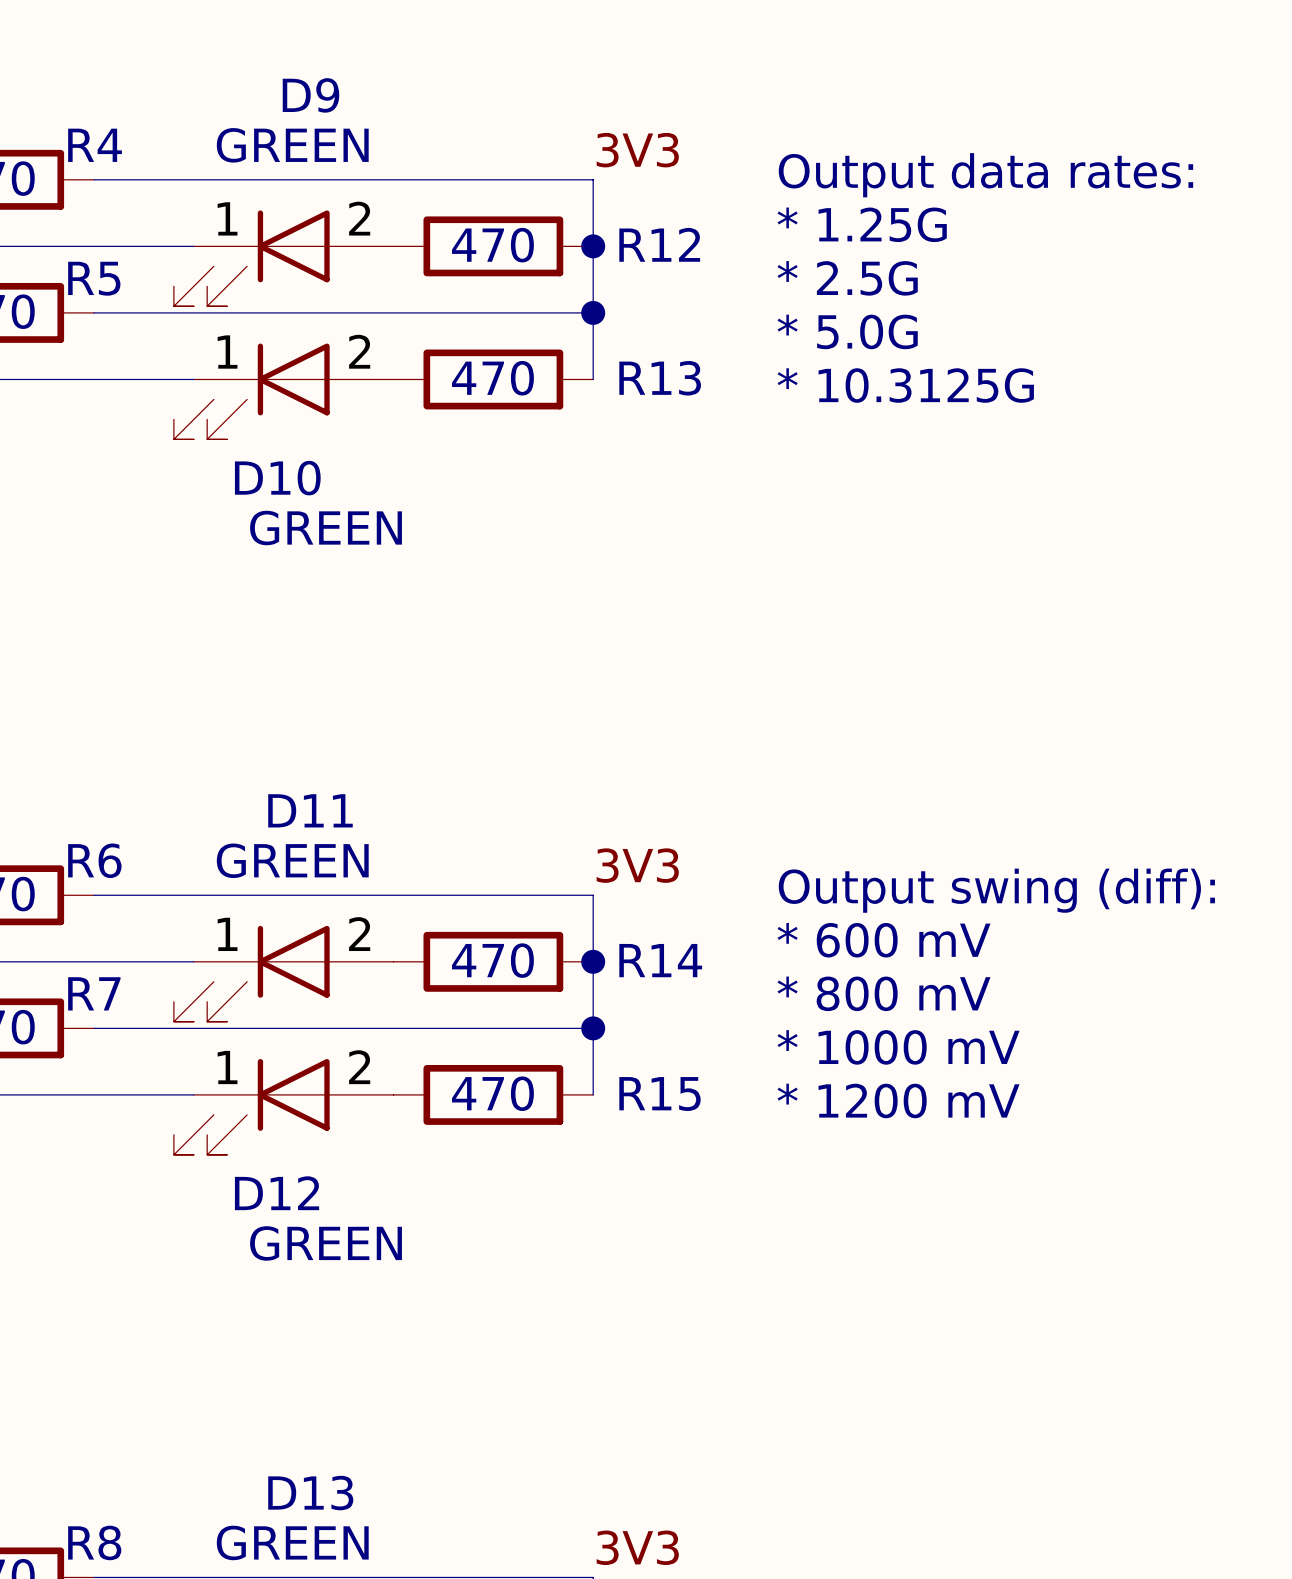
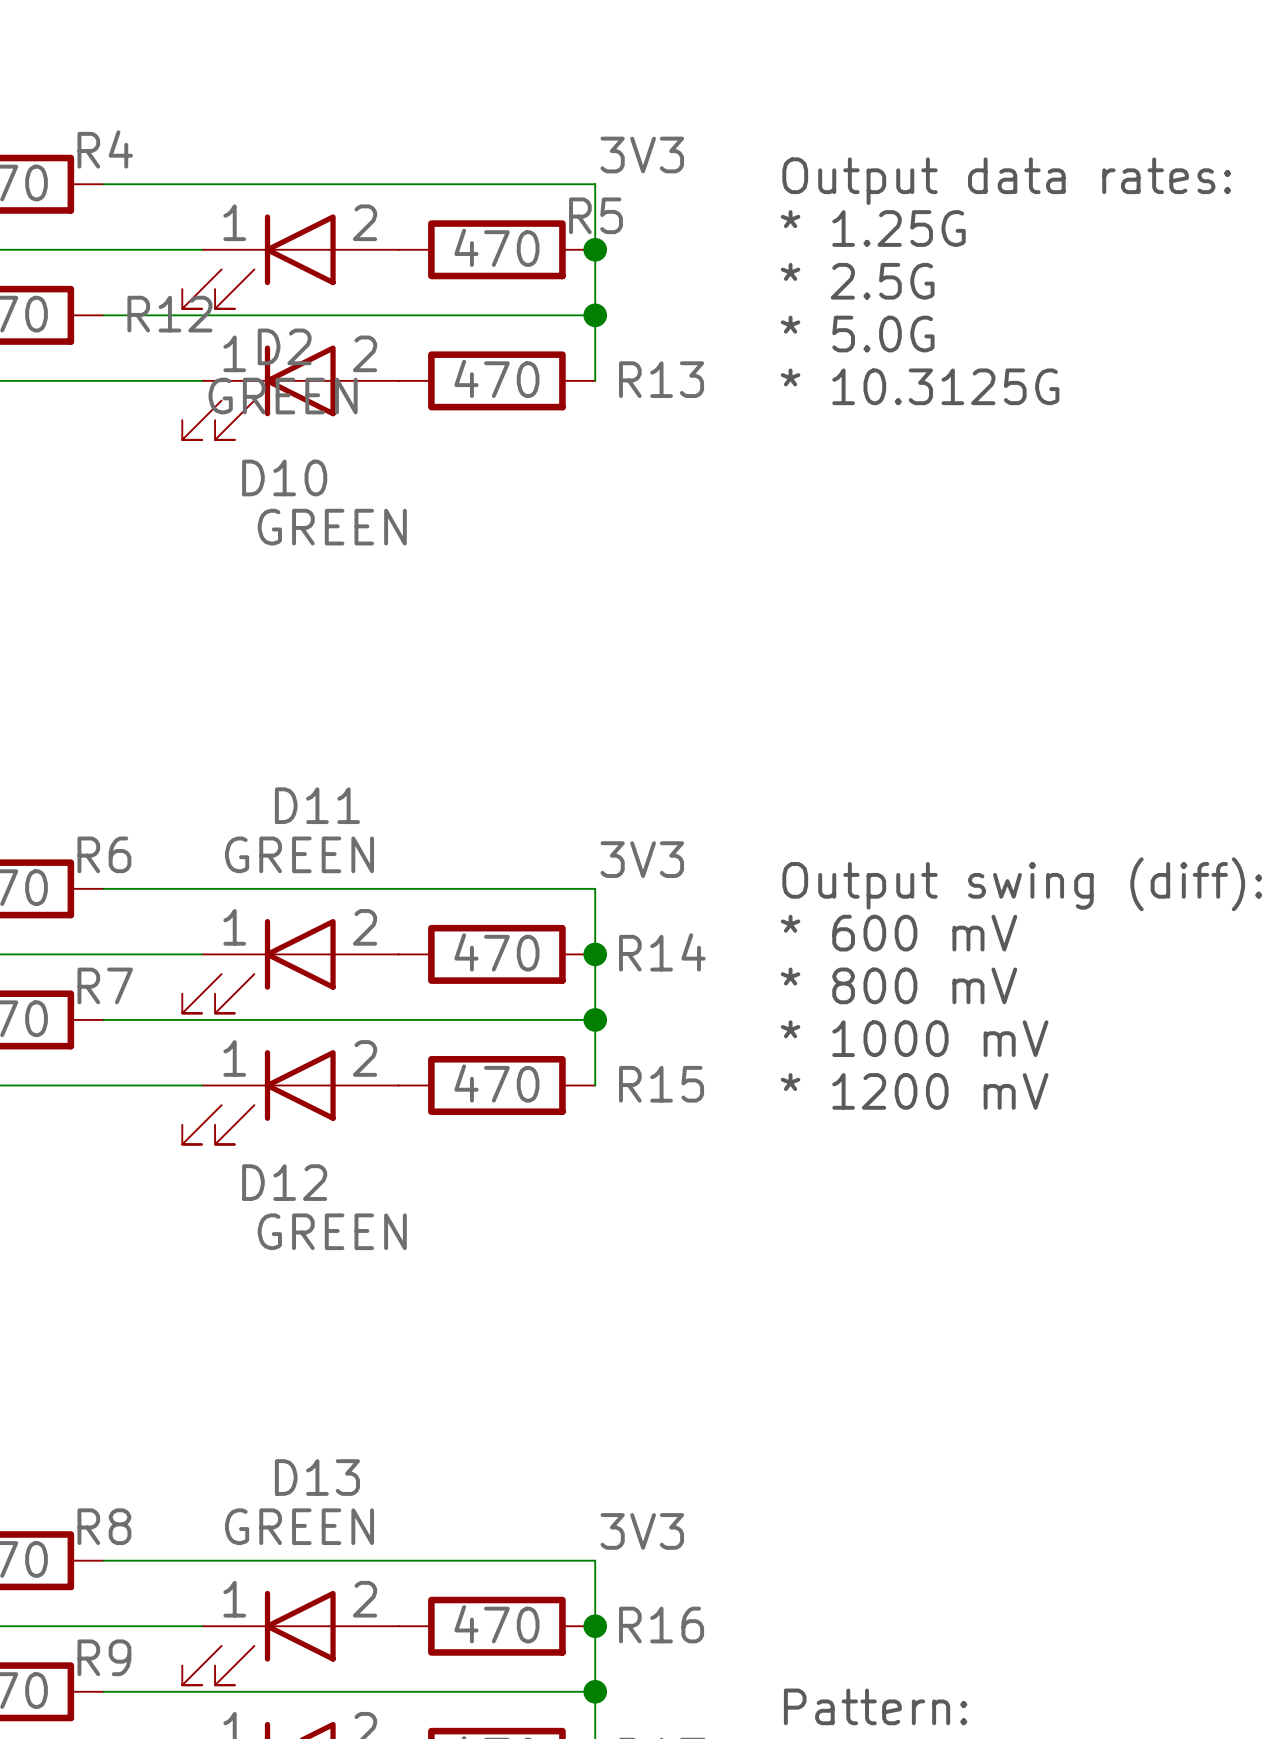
D9 name: D9 (310, 95) -> D2 (284, 346)
D9 value position: GREEN (292, 145) -> GREEN (283, 396)
R12 name: R12 (659, 244) -> R5 (596, 215)
R5 name: R5 (94, 278) -> R12 (169, 314)

